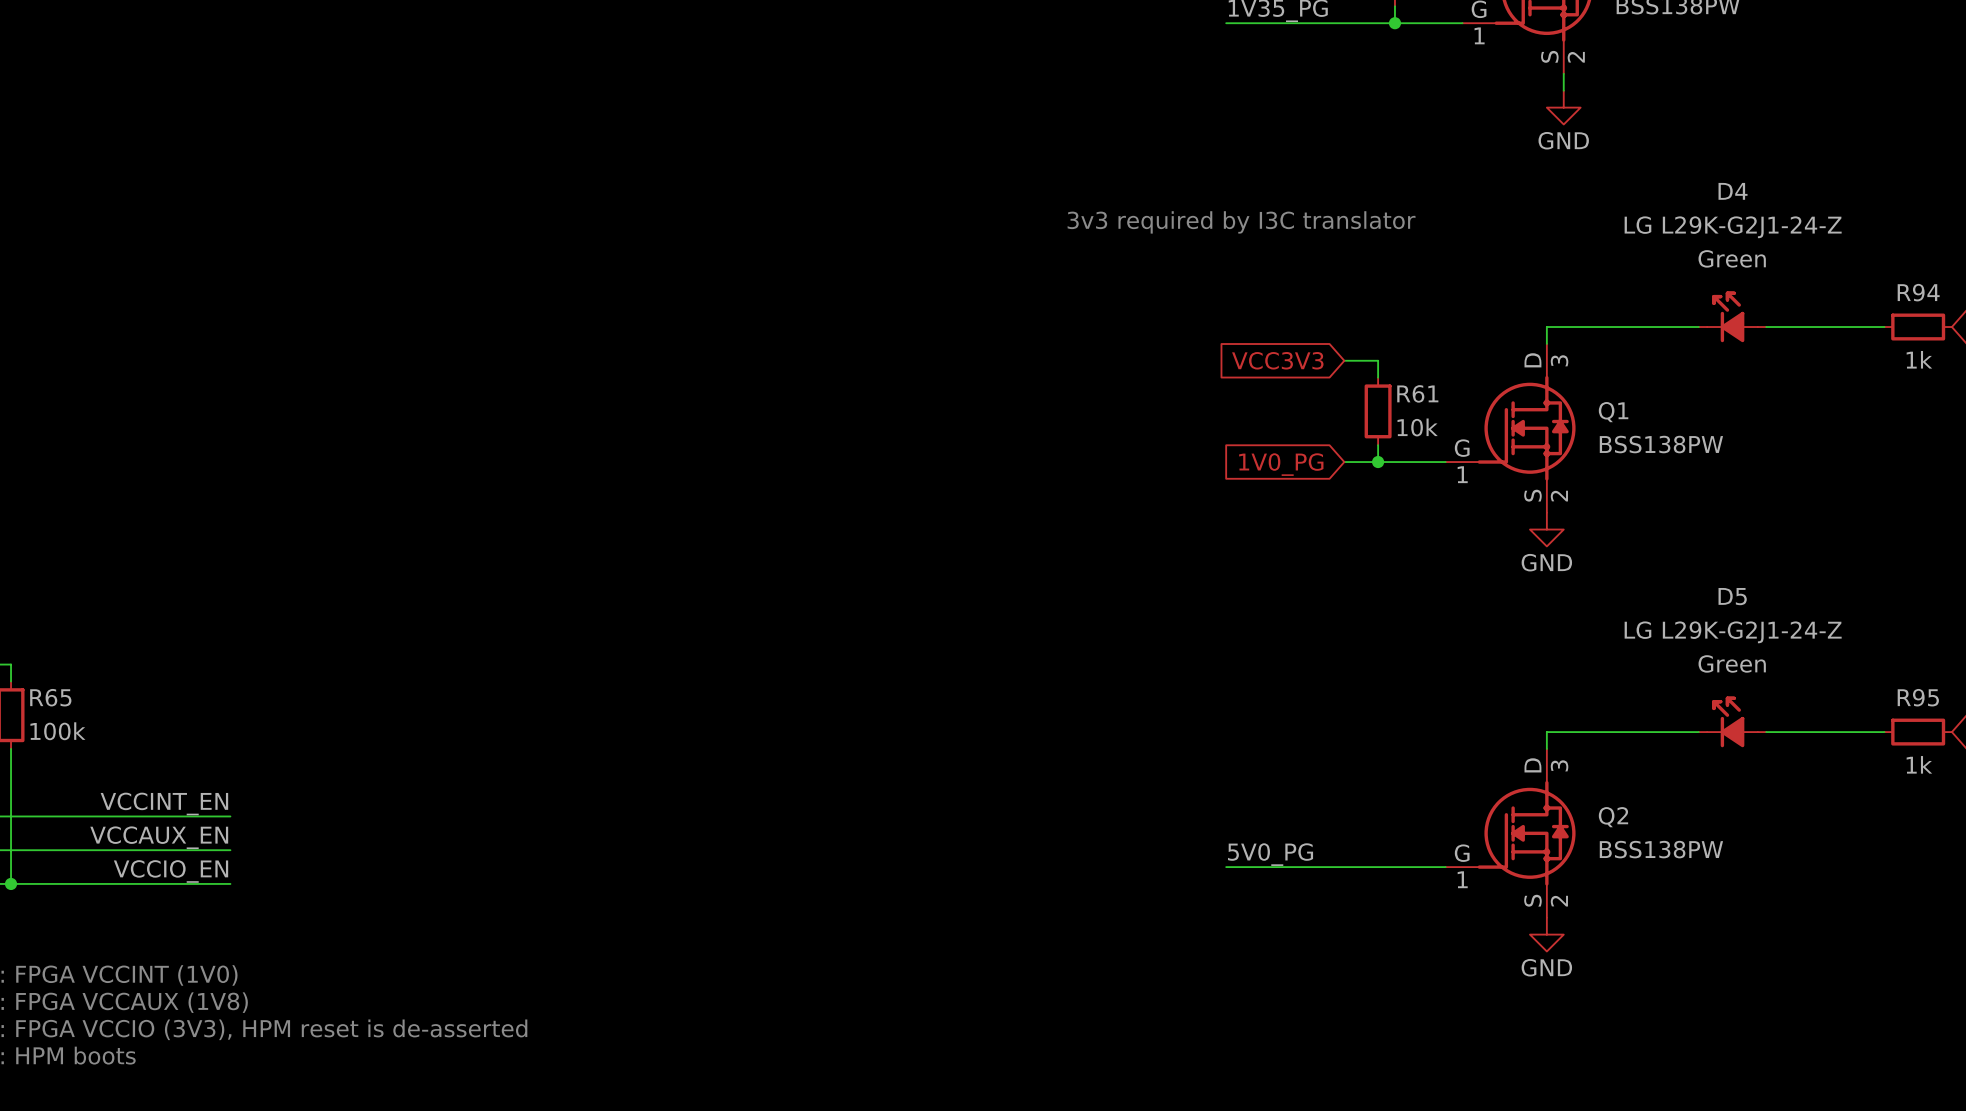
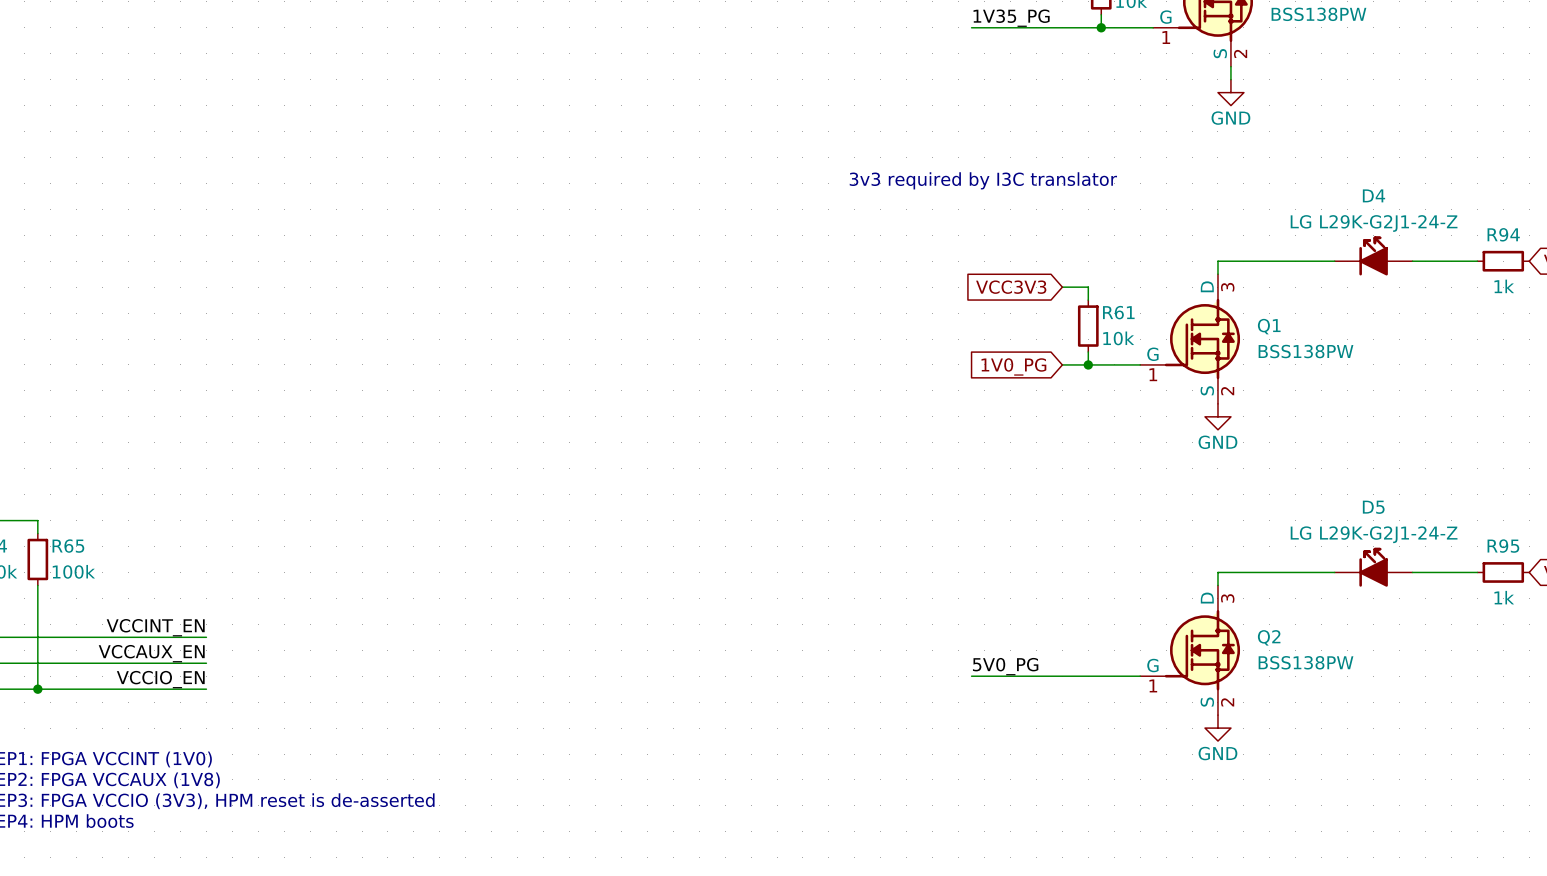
D4 name position: D4 (1733, 191) -> D4 (1373, 195)
D4 text position: LG L29K-G2J1-24-Z (1733, 227) -> LG L29K-G2J1-24-Z (1374, 223)
D4 text: Green (1732, 258) -> none
D4 symbol: [1698, 291, 1767, 343] -> [1334, 236, 1413, 276]
D5 name position: D5 (1732, 596) -> D5 (1373, 507)
D5 text position: LG L29K-G2J1-24-Z (1733, 632) -> LG L29K-G2J1-24-Z (1374, 534)
D5 text: Green (1732, 663) -> none
D5 symbol: [1698, 696, 1767, 748] -> [1334, 547, 1413, 587]

